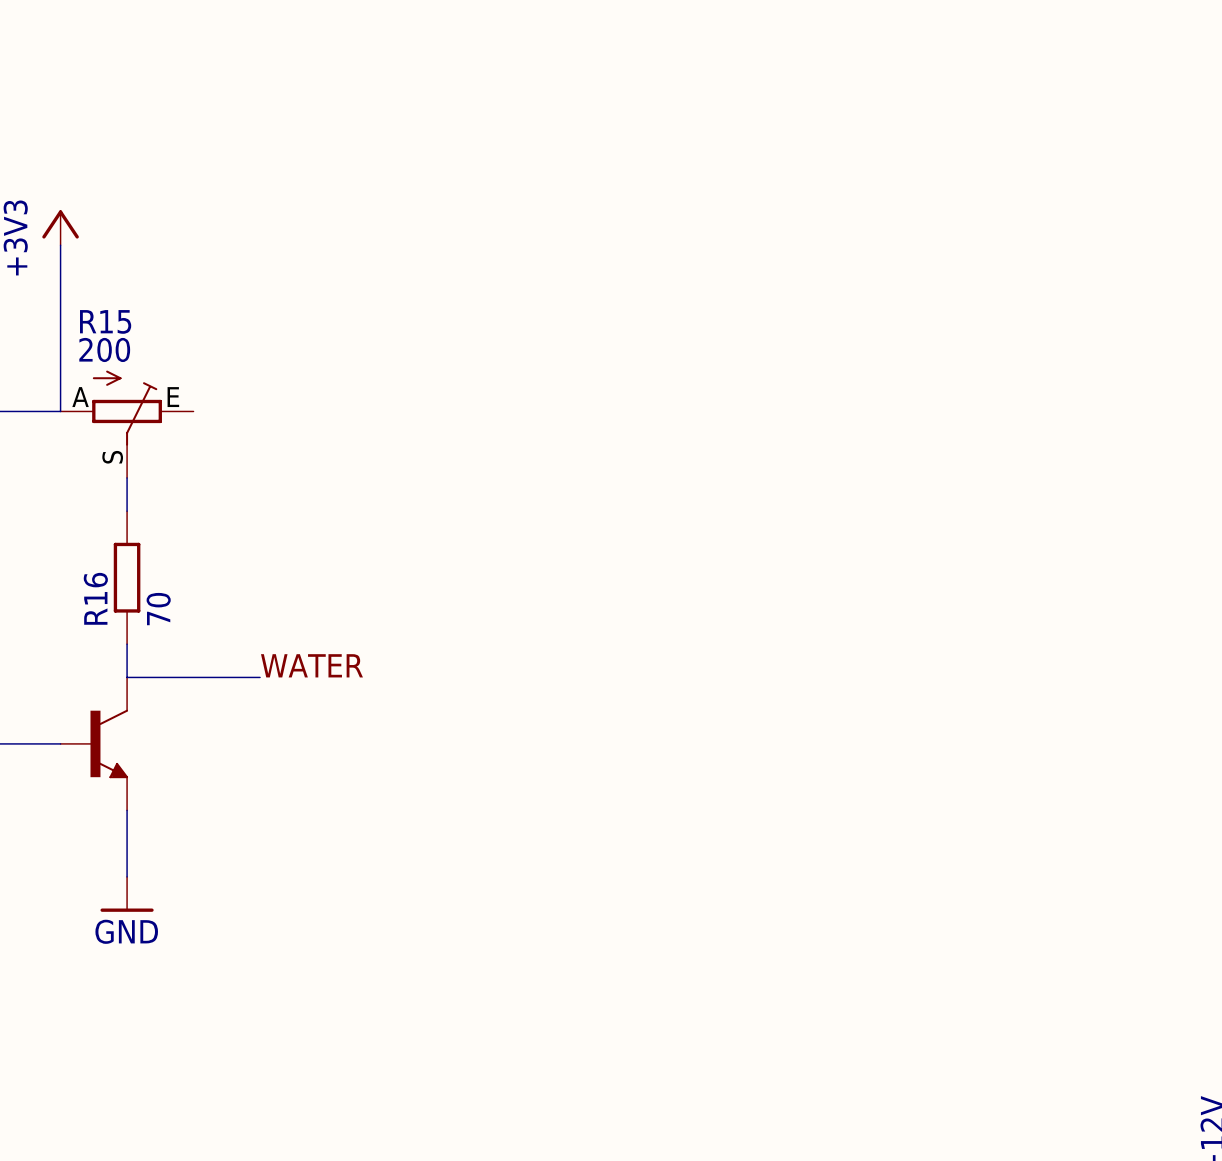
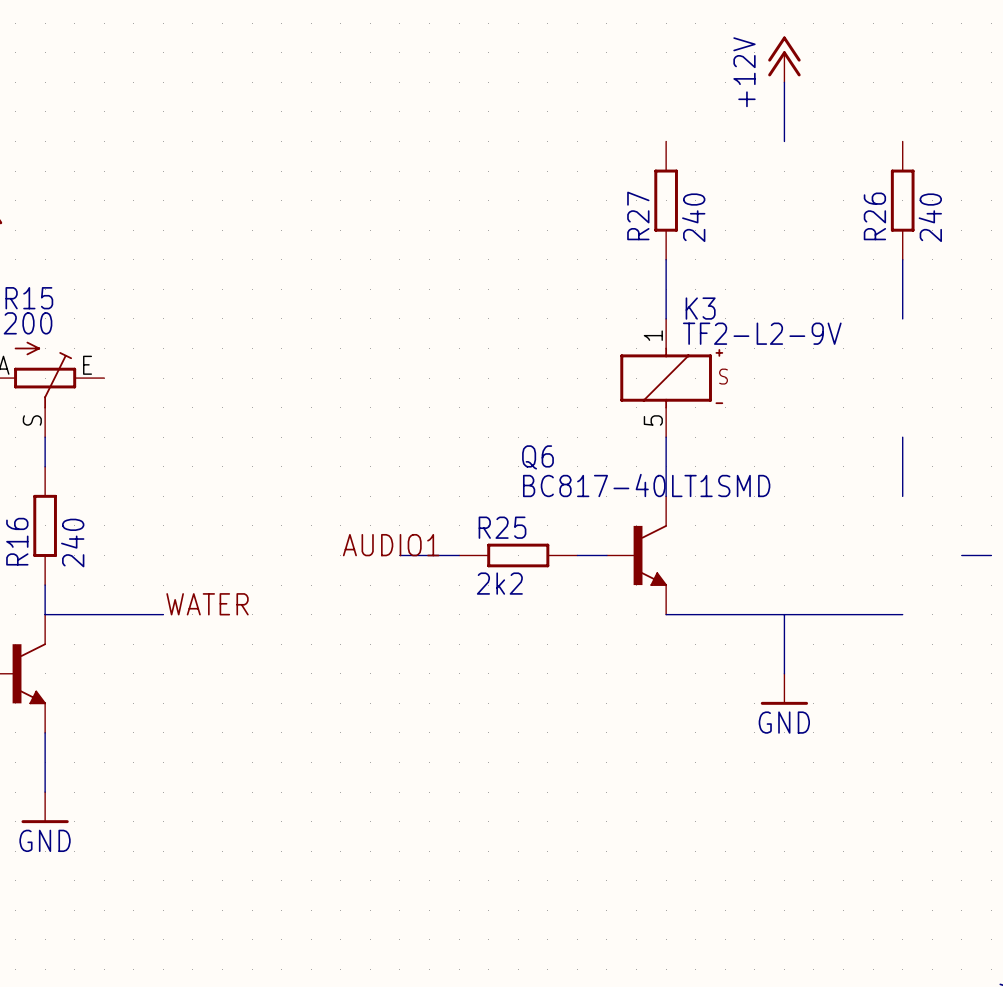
power symbol: none -> +12V (784, 59)
wire: none -> (784, 82) (784, 141)
R27: none -> 240 (666, 200)
R26: none -> 240 (902, 200)
wire: none -> (666, 259) (666, 318)
wire: none -> (902, 259) (902, 318)
K3: none -> TF2-L2-9V (671, 378)
wire: none -> (666, 437) (666, 496)
wire: none -> (902, 437) (902, 496)
label: none -> AUDIO1 (391, 545)
R16 value: 70 (158, 609) -> 240 (72, 543)
wire: none -> (399, 555) (459, 555)
R25: none -> 2k2 (518, 555)
wire: none -> (577, 555) (606, 555)
Q6: none -> BC817-40LT1SMD (637, 555)
wire: none -> (961, 555) (991, 555)
wire: none -> (666, 614) (902, 614)
wire: none -> (784, 614) (784, 673)
power symbol: none -> GND (784, 689)

